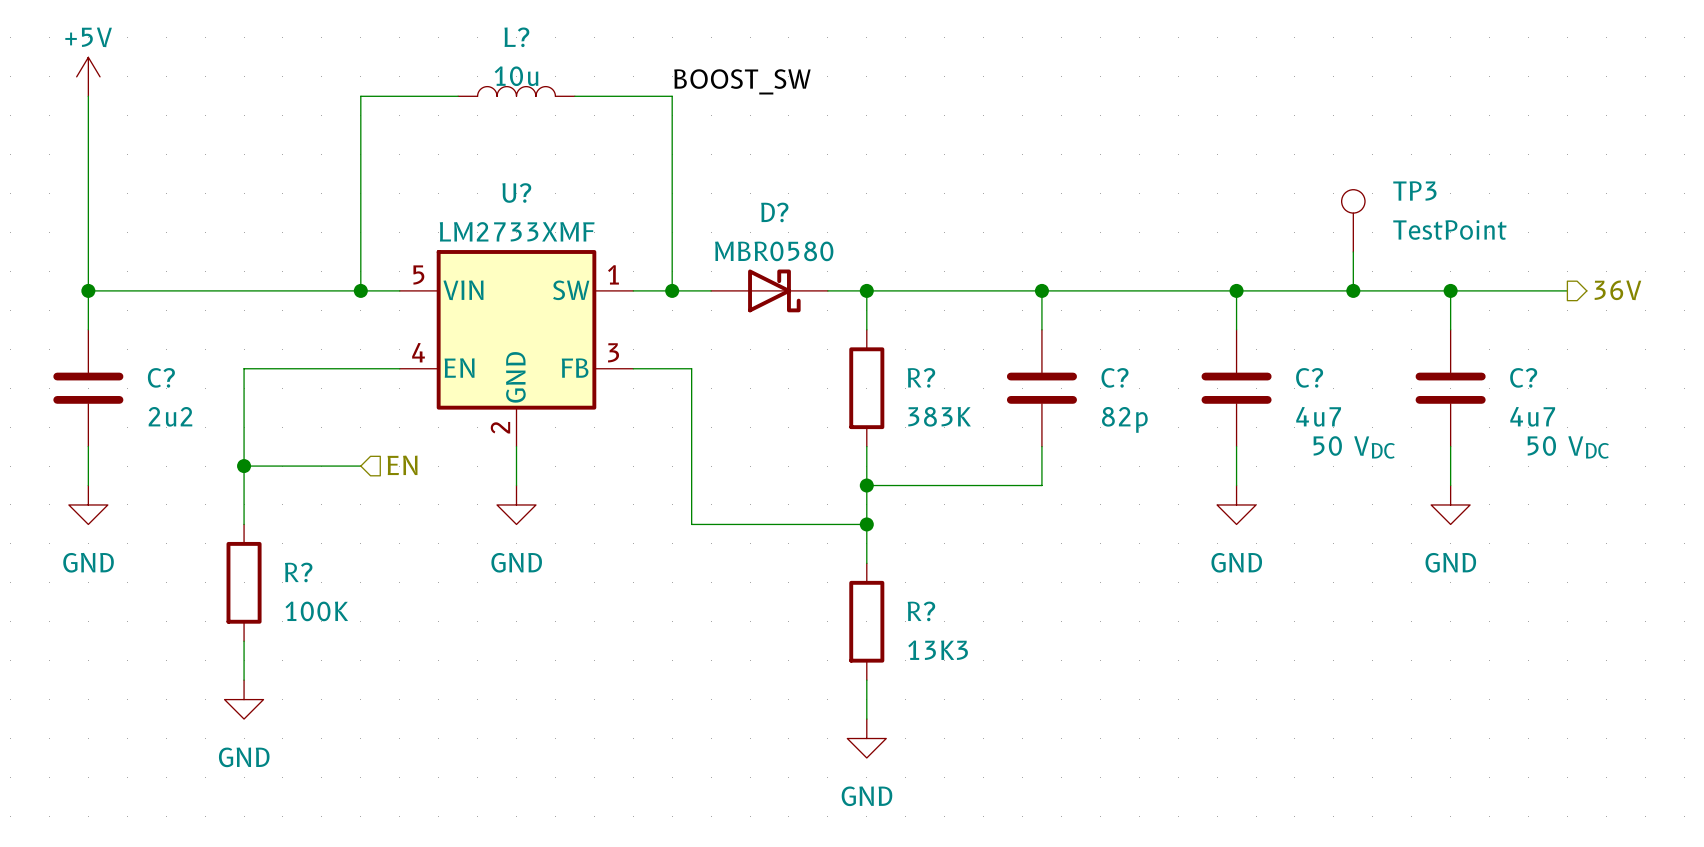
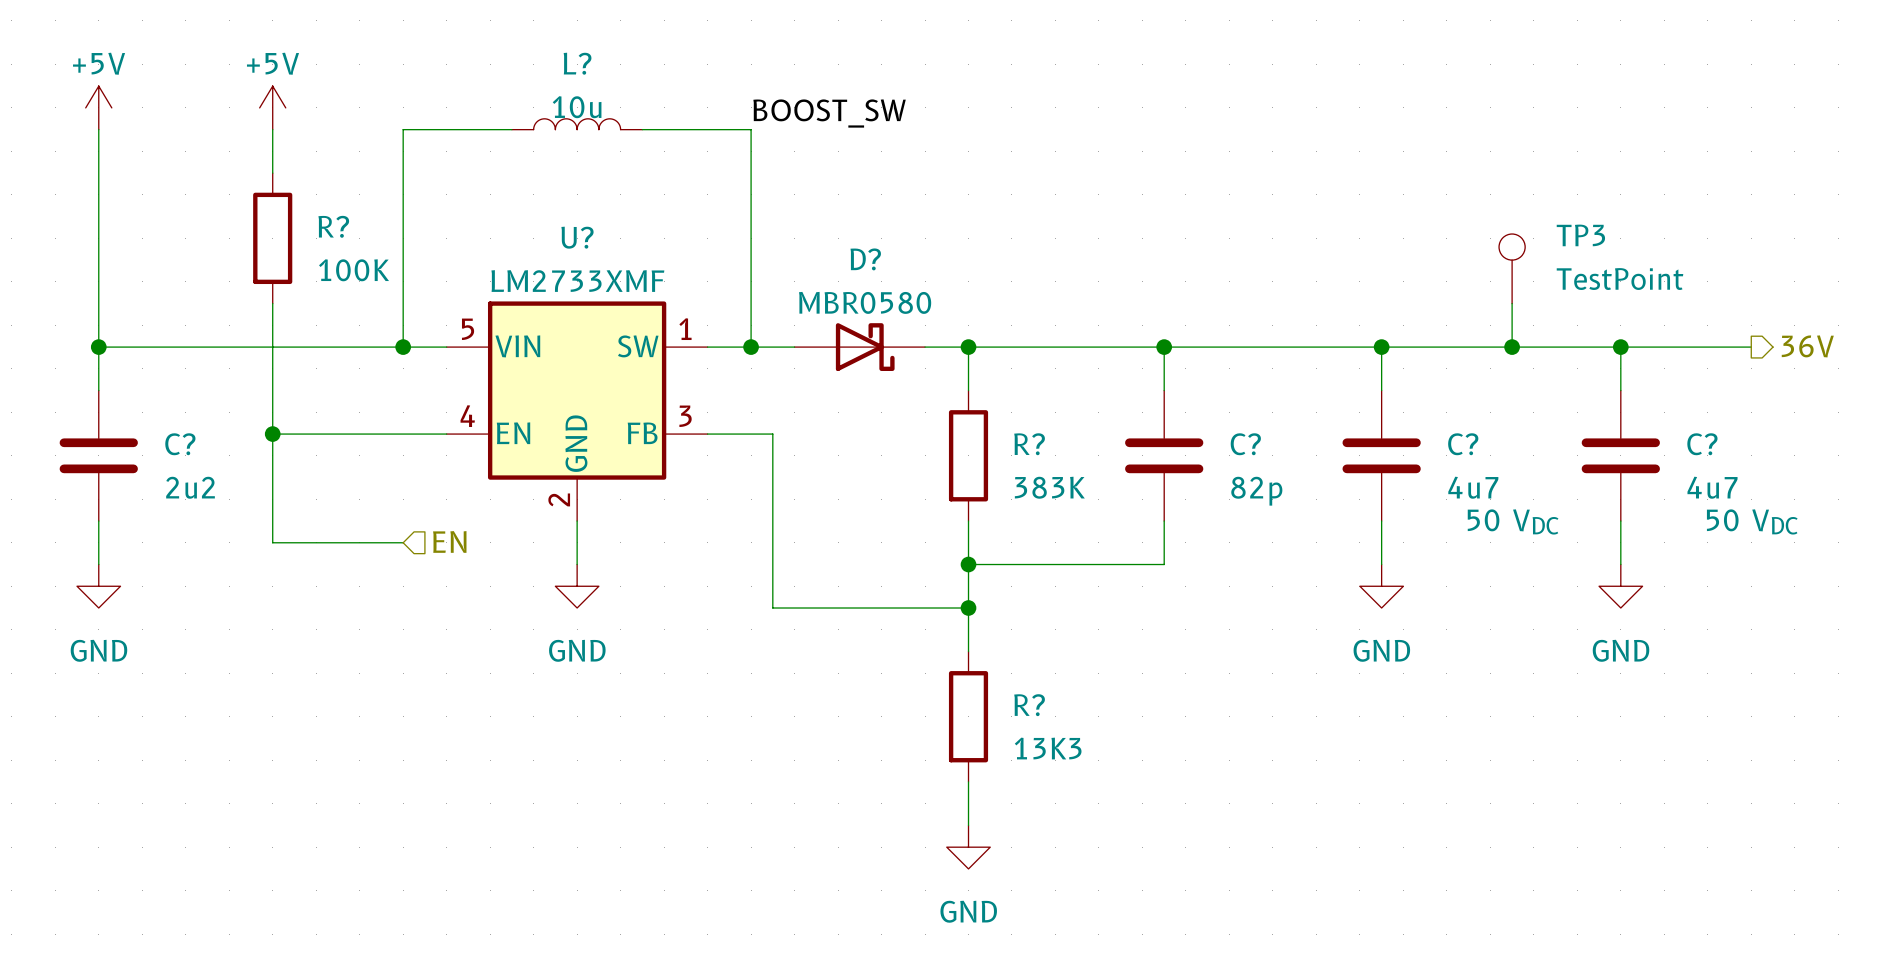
power symbol: none -> +5V (272, 107)
wire: none -> (272, 129) (272, 173)
R?: none -> 100K (272, 238)
wire: none -> (272, 303) (272, 434)
junction: none -> (272, 434)
wire: (244, 466) (244, 524) -> none
junction: (244, 466) -> none
R?: 100K (244, 582) -> none
wire: (244, 641) (244, 680) -> none
power symbol: GND (244, 699) -> none

